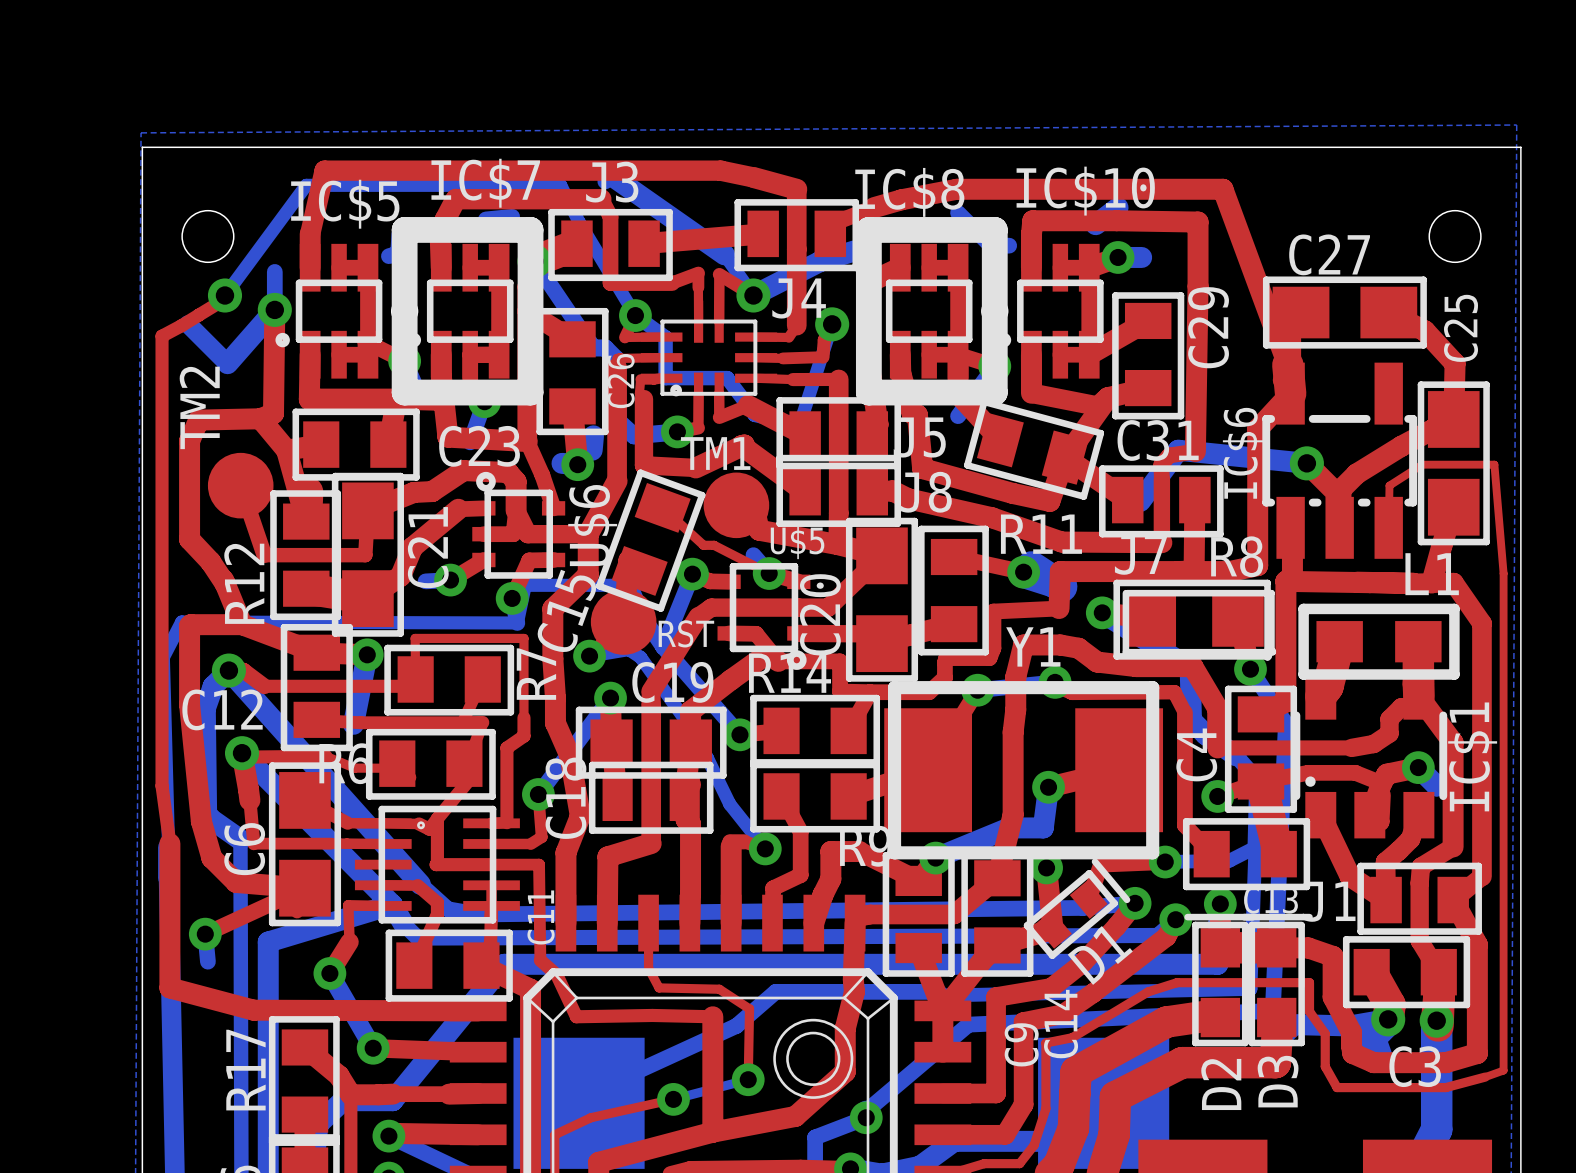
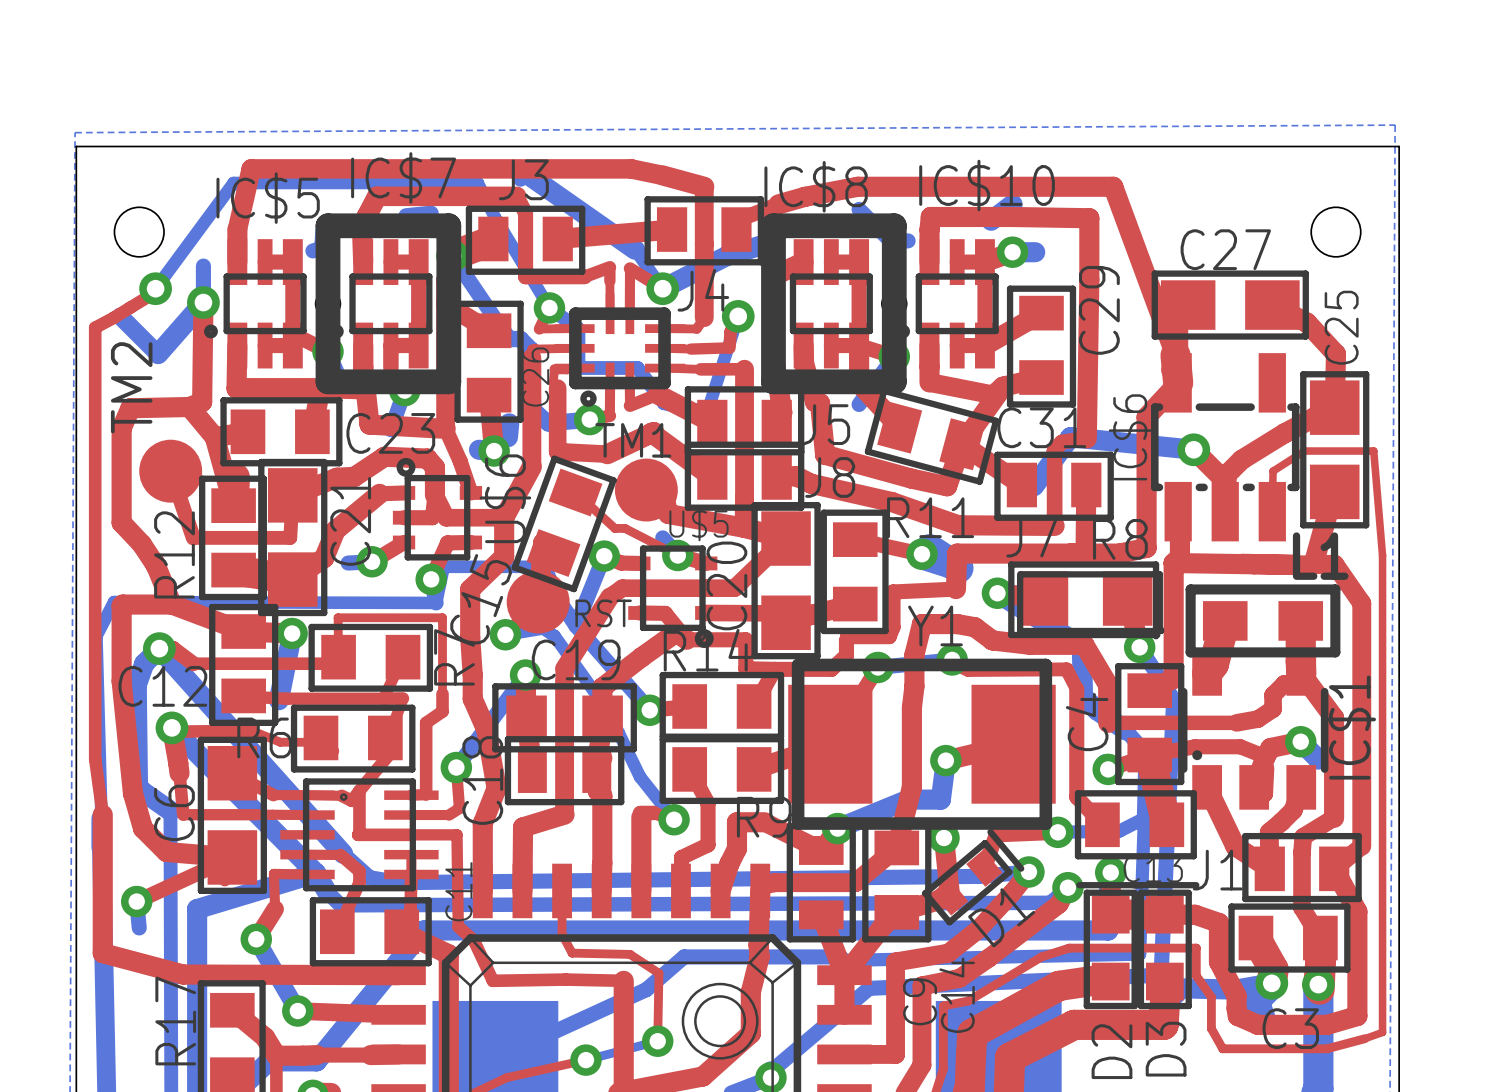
part footprint: [640, 300, 778, 420] -> [554, 293, 686, 409]

